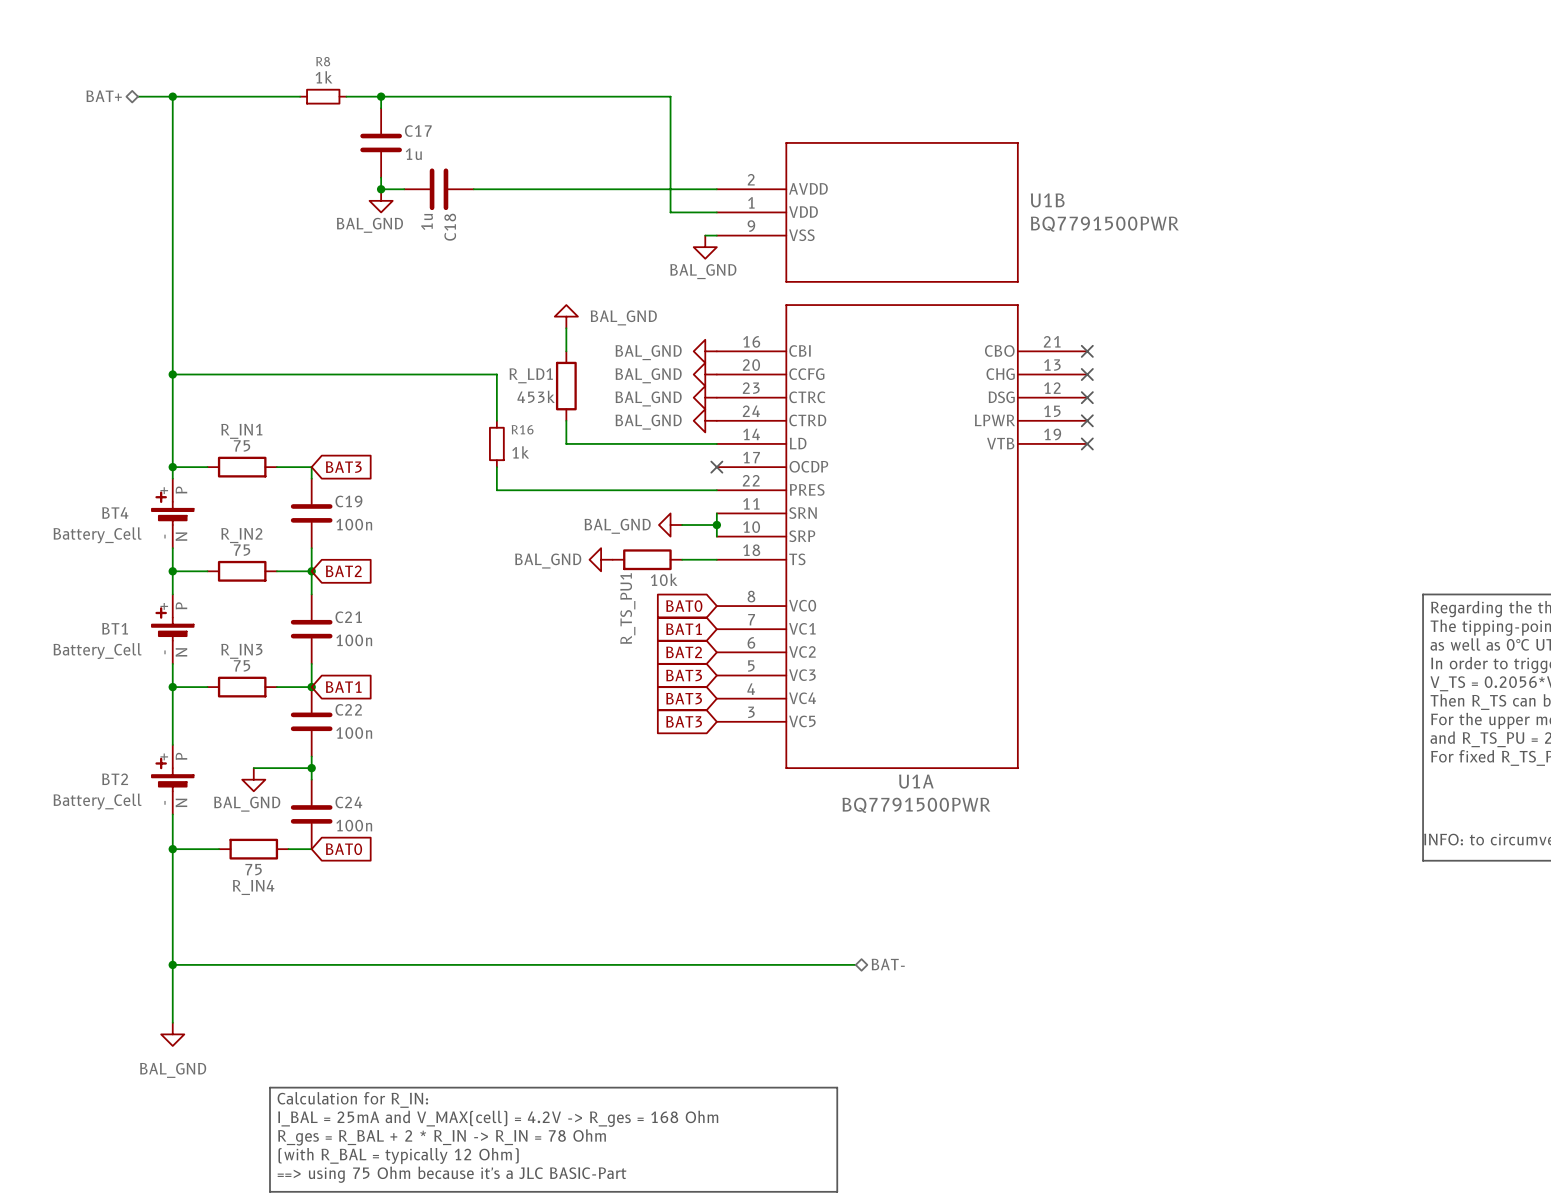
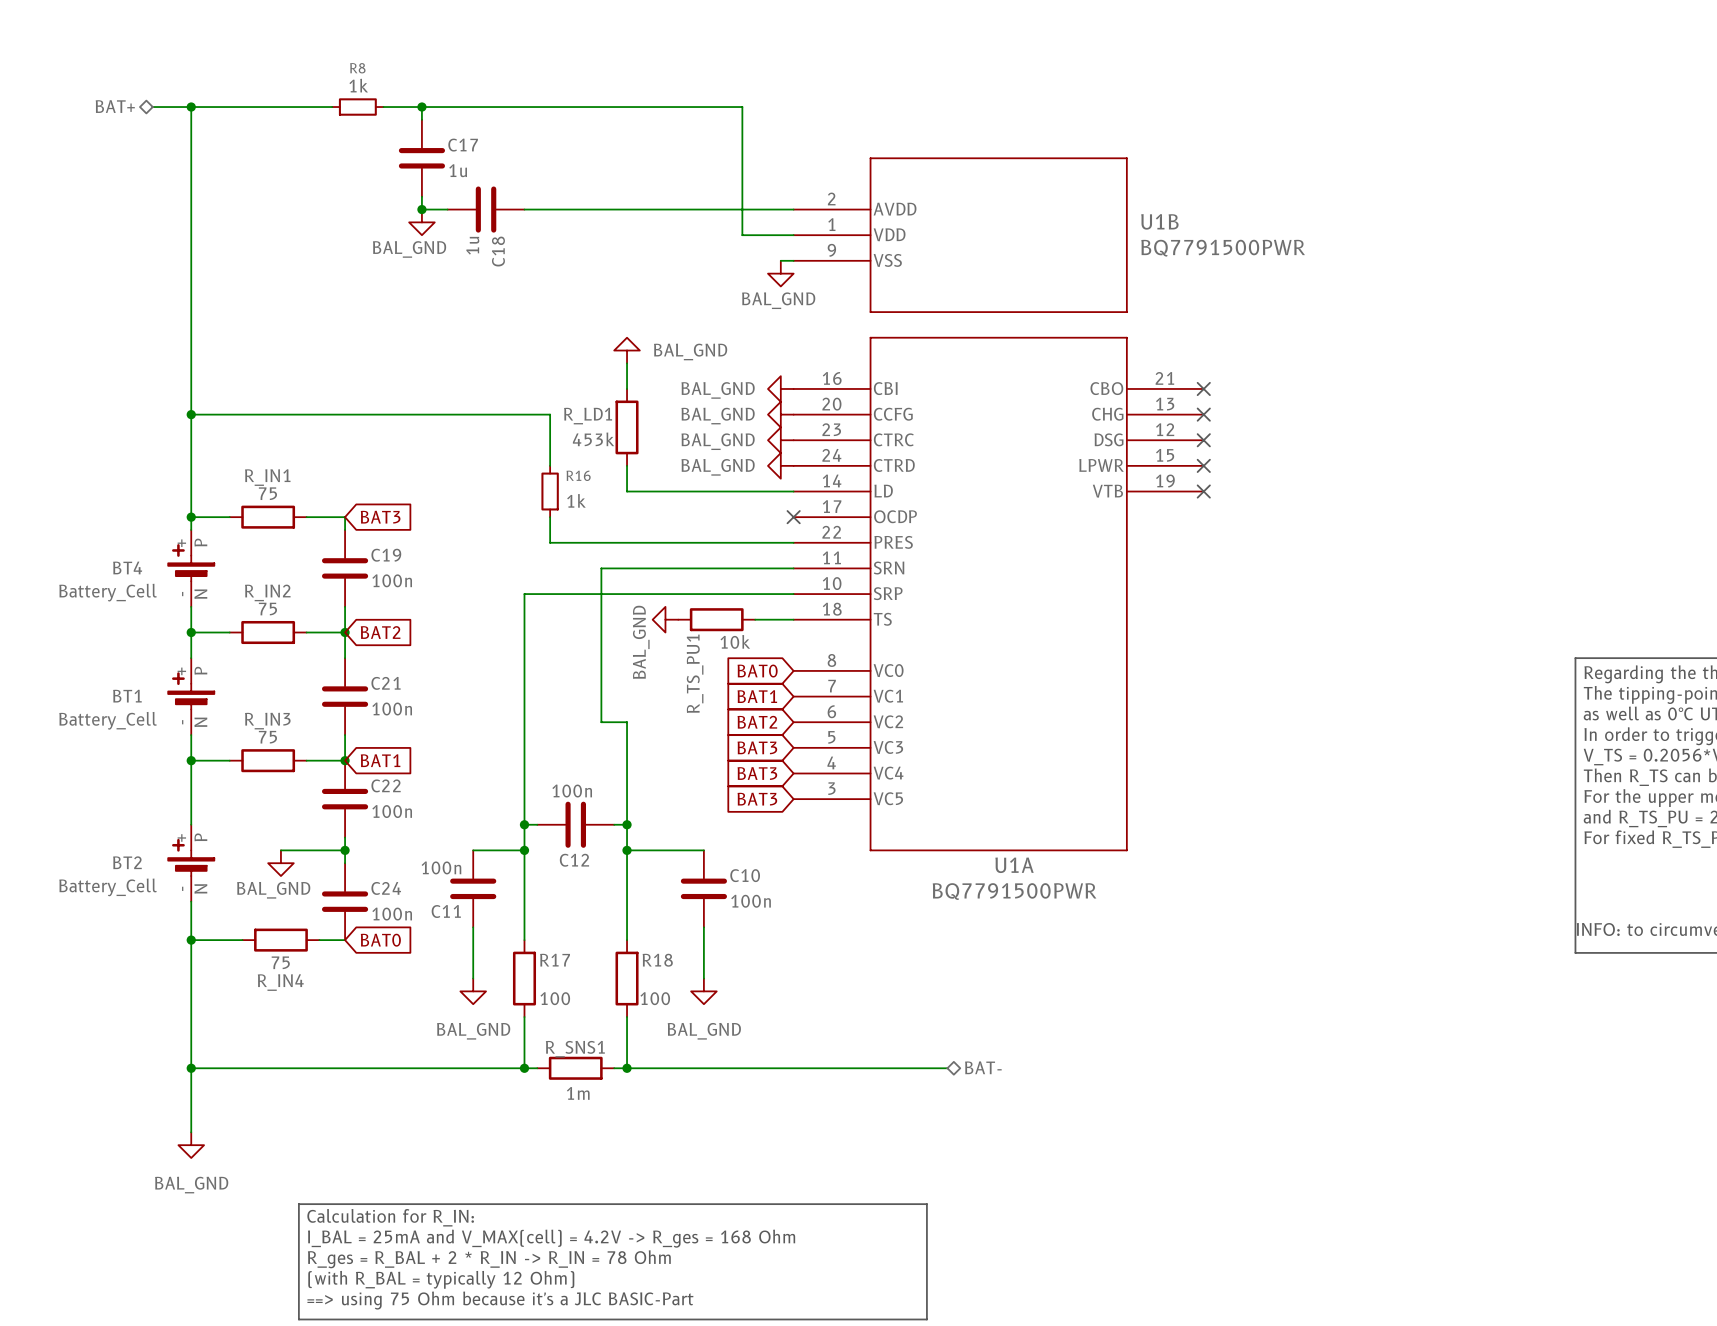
wire: (716, 513) (716, 536) -> (793, 568) (601, 568) (601, 722) (627, 722) (627, 940)
power symbol: BAL_GND (670, 525) -> none
wire: (682, 525) (716, 525) -> none
junction: (716, 525) -> none
wire: none -> (793, 594) (524, 594) (524, 940)
power symbol text rotation: 0° (548, 561) -> 90° counterclockwise (641, 642)
wire: none -> (524, 824) (537, 824)
junction: none -> (524, 824)
C12: none -> 100n (575, 824)
wire: none -> (614, 824) (627, 824)
junction: none -> (627, 824)
wire: none -> (473, 850) (524, 850)
junction: none -> (524, 850)
junction: none -> (627, 850)
C11: none -> 100n (473, 888)
C10: none -> 100n (703, 888)
wire: none -> (473, 927) (473, 978)
wire: none -> (703, 927) (703, 978)
R17: none -> 100 (524, 978)
R18: none -> 100 (627, 978)
power symbol: none -> BAL_GND (473, 991)
power symbol: none -> BAL_GND (703, 991)
wire: none -> (524, 1017) (524, 1068)
wire: none -> (627, 1017) (627, 1068)
junction: none -> (524, 1068)
wire: (485, 964) (554, 964) -> (627, 850) (703, 850)
R_SNS1: none -> 1m (575, 1068)
junction: none -> (627, 1068)

